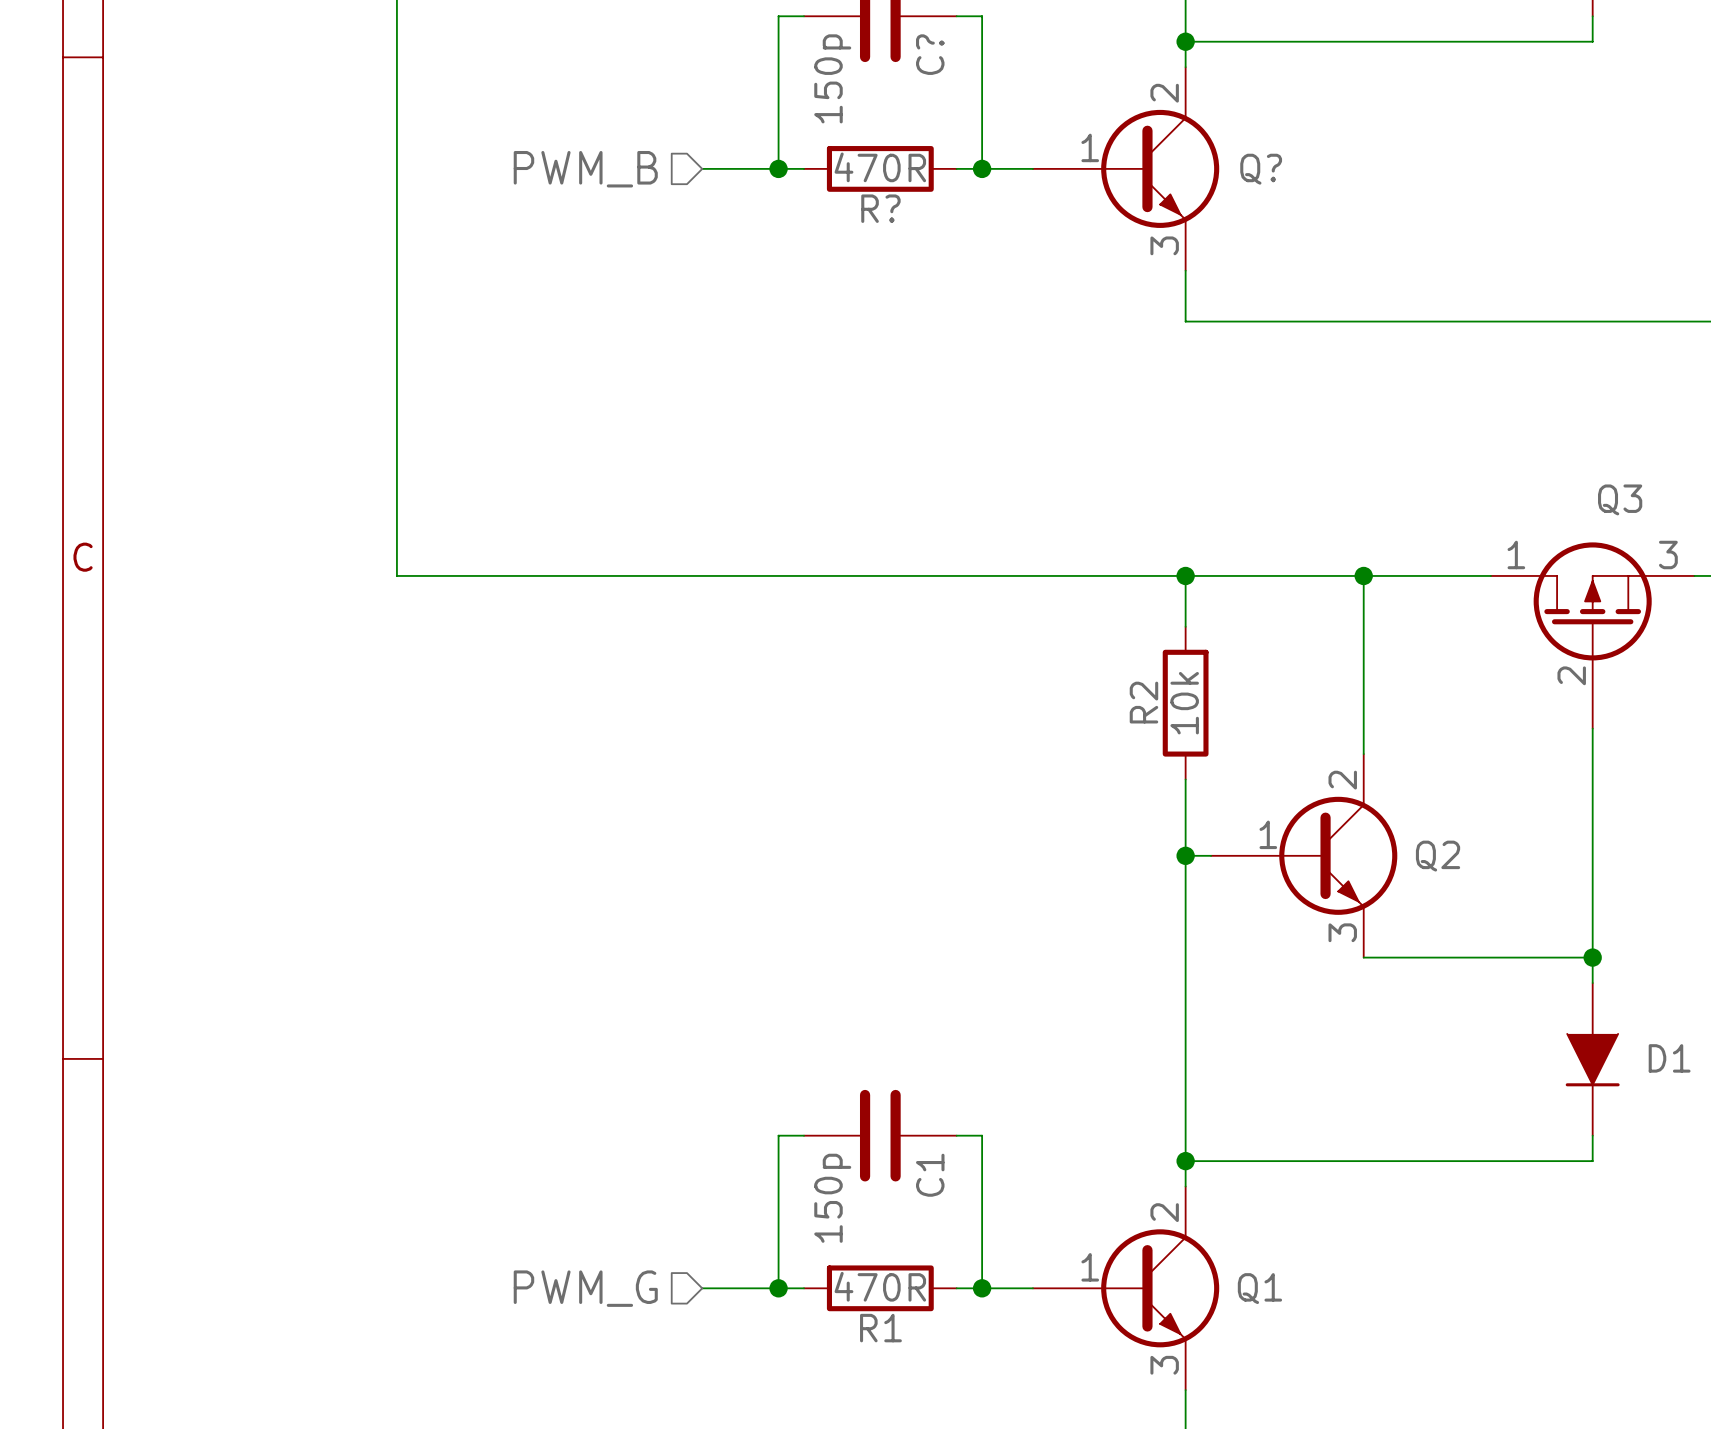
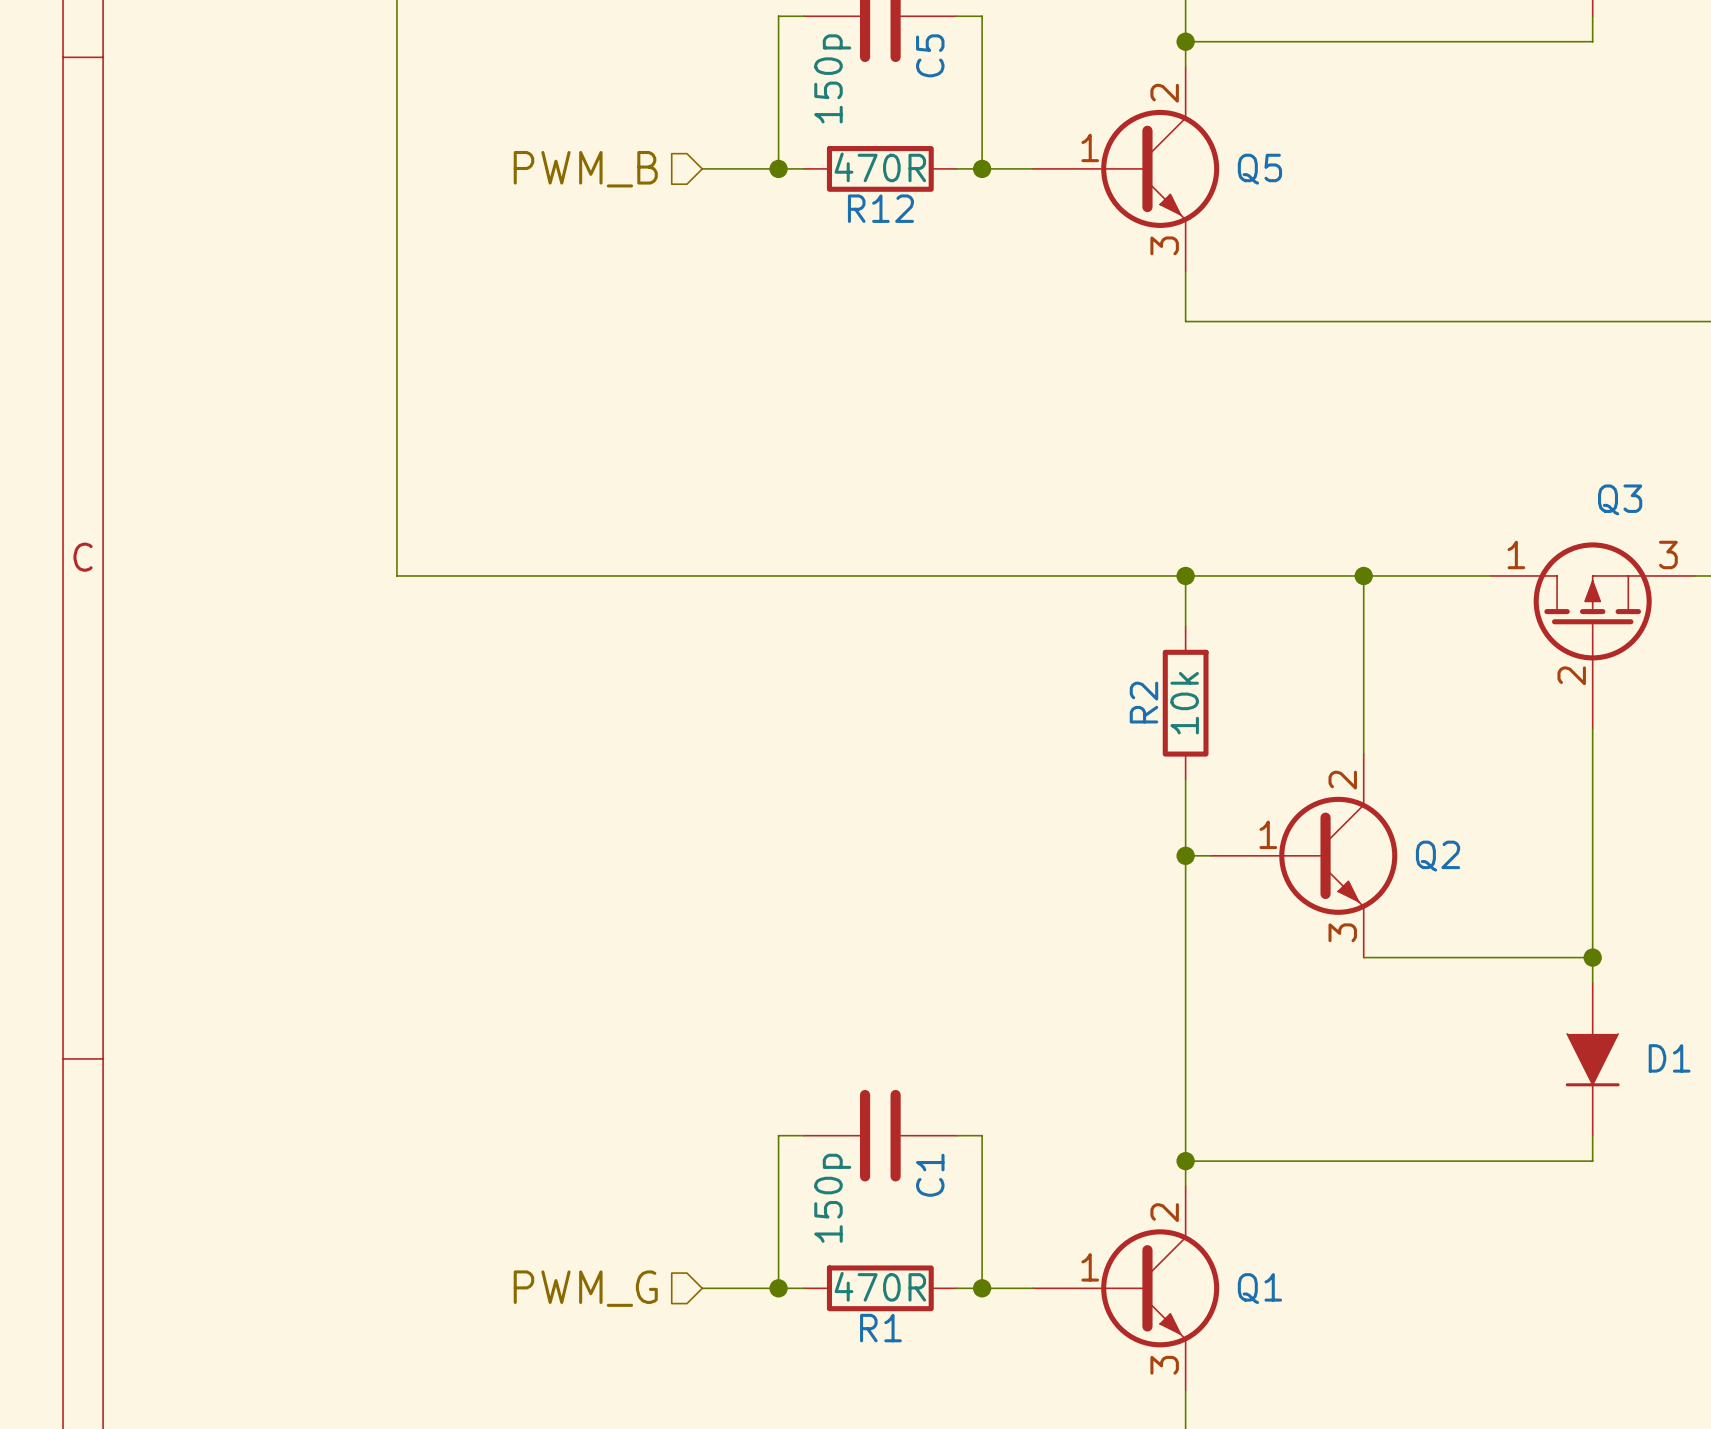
C? name: C? (930, 54) -> C5 (930, 55)
Q? name: Q? (1261, 169) -> Q5 (1259, 169)
R? name: R? (880, 208) -> R12 (880, 208)

